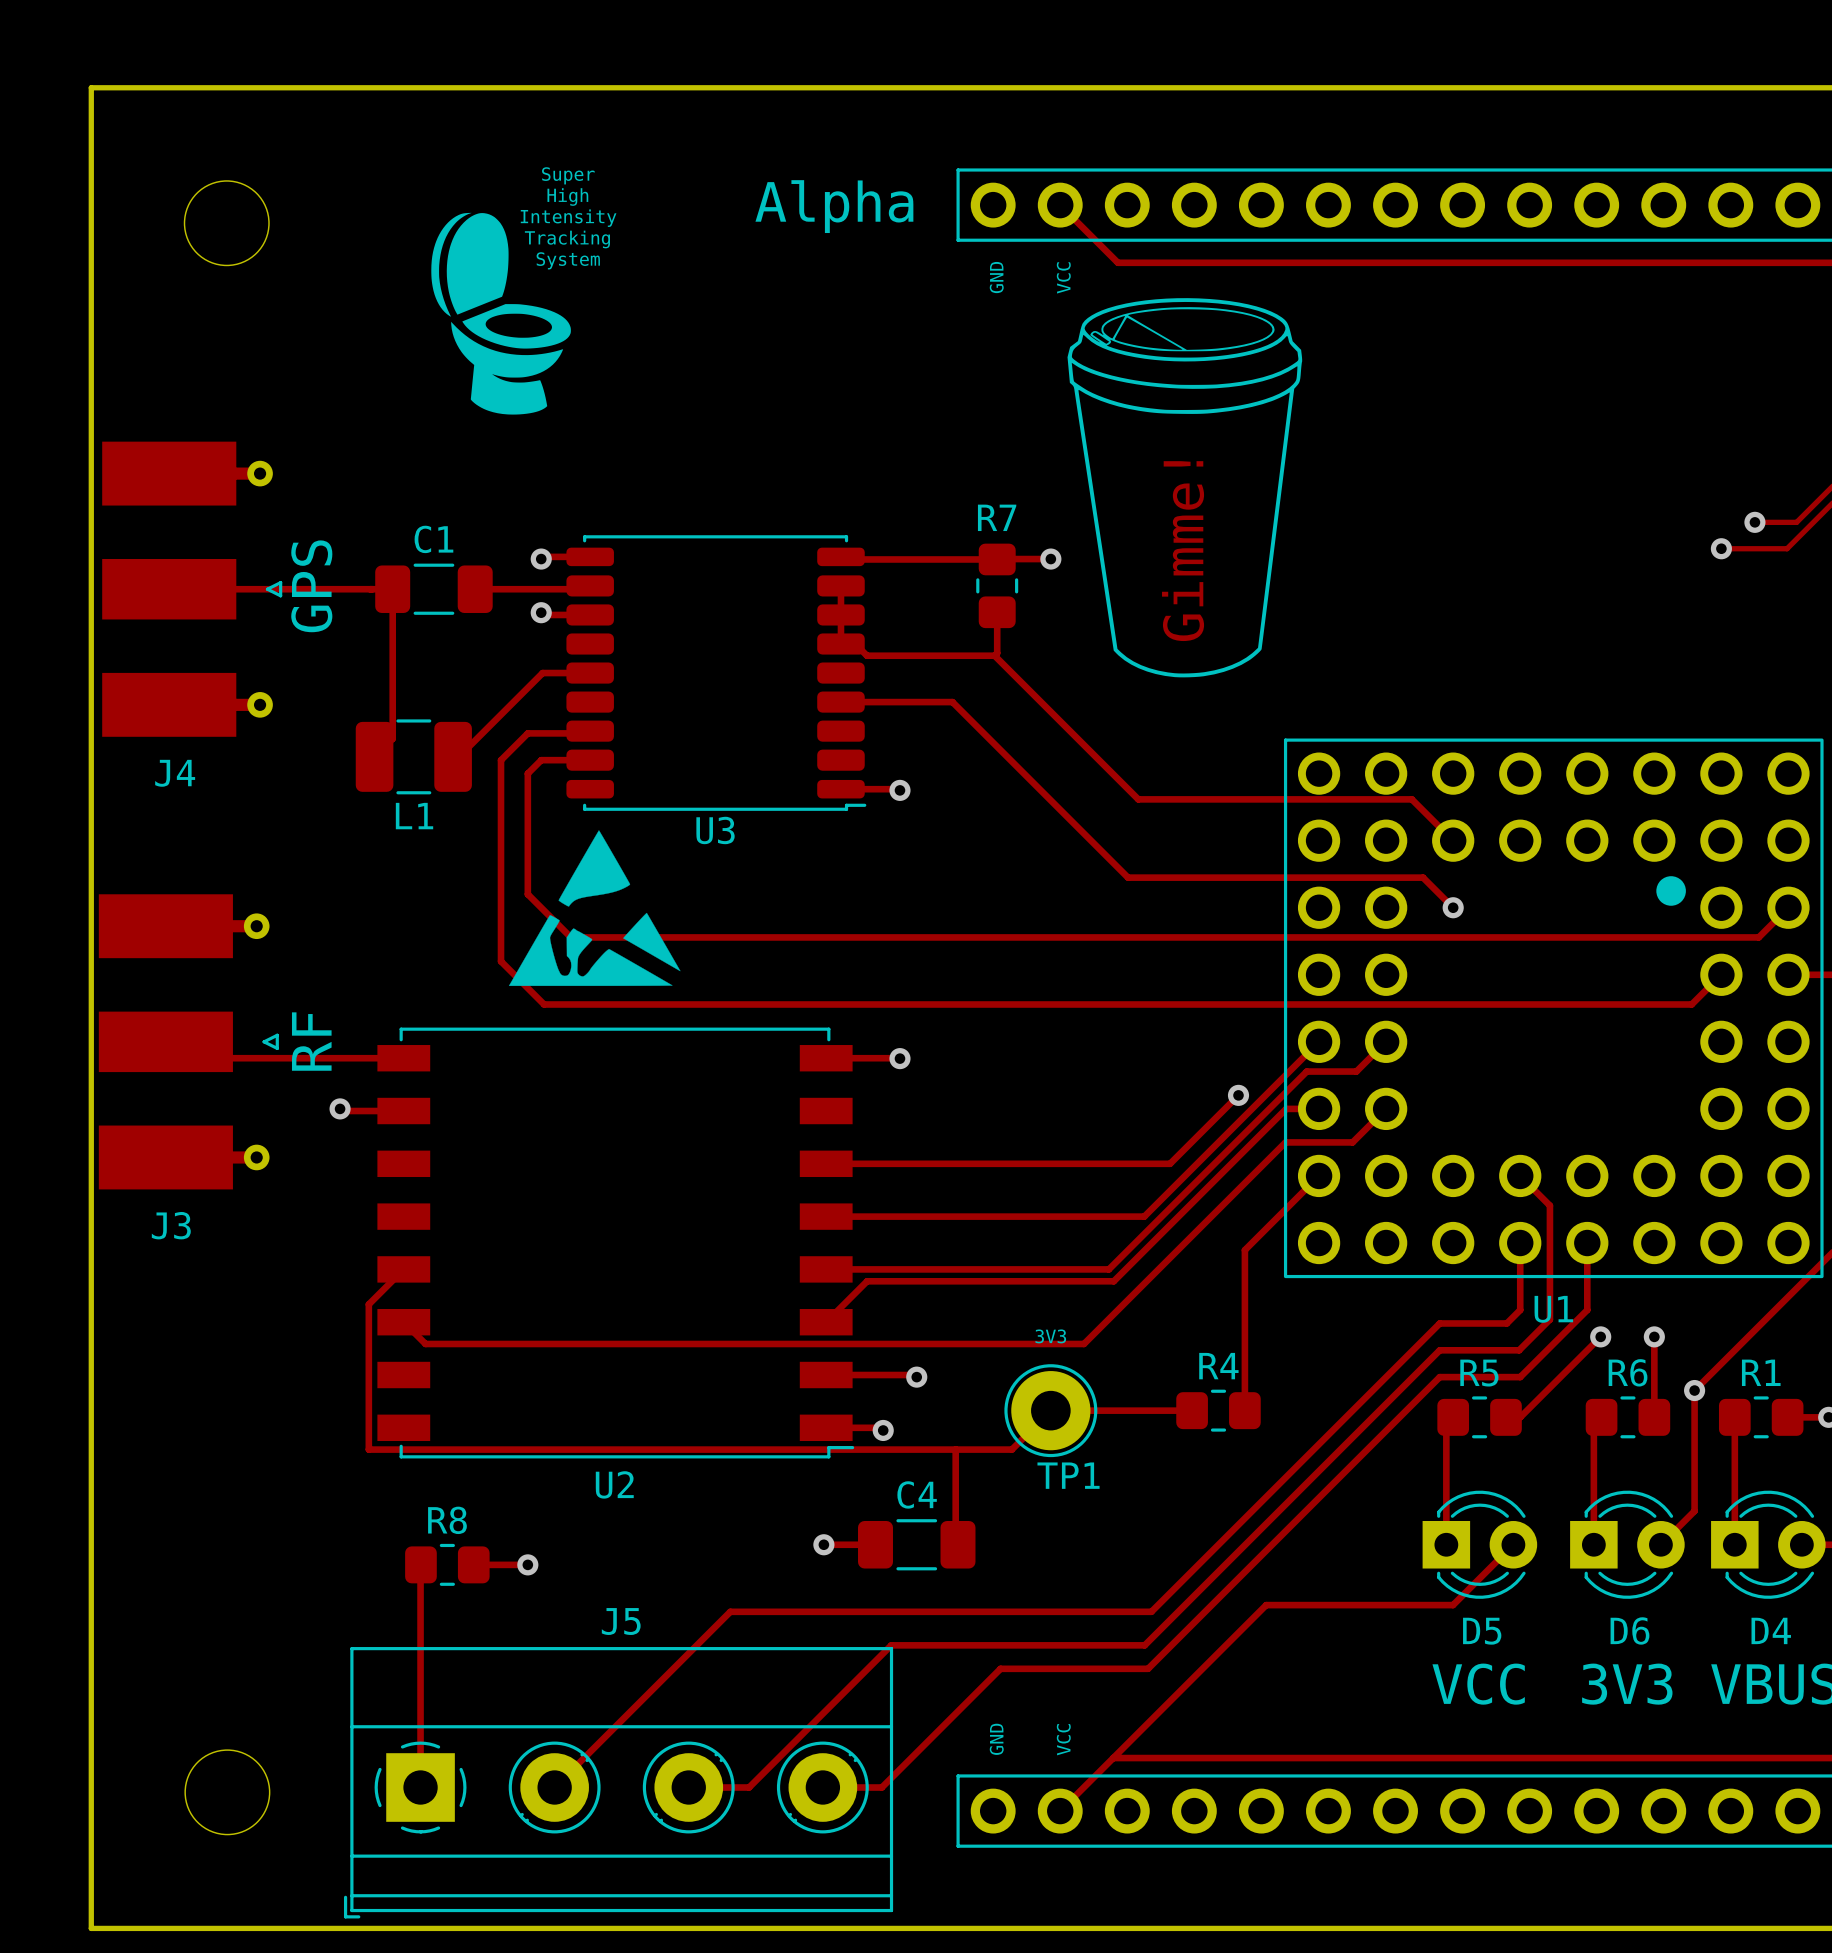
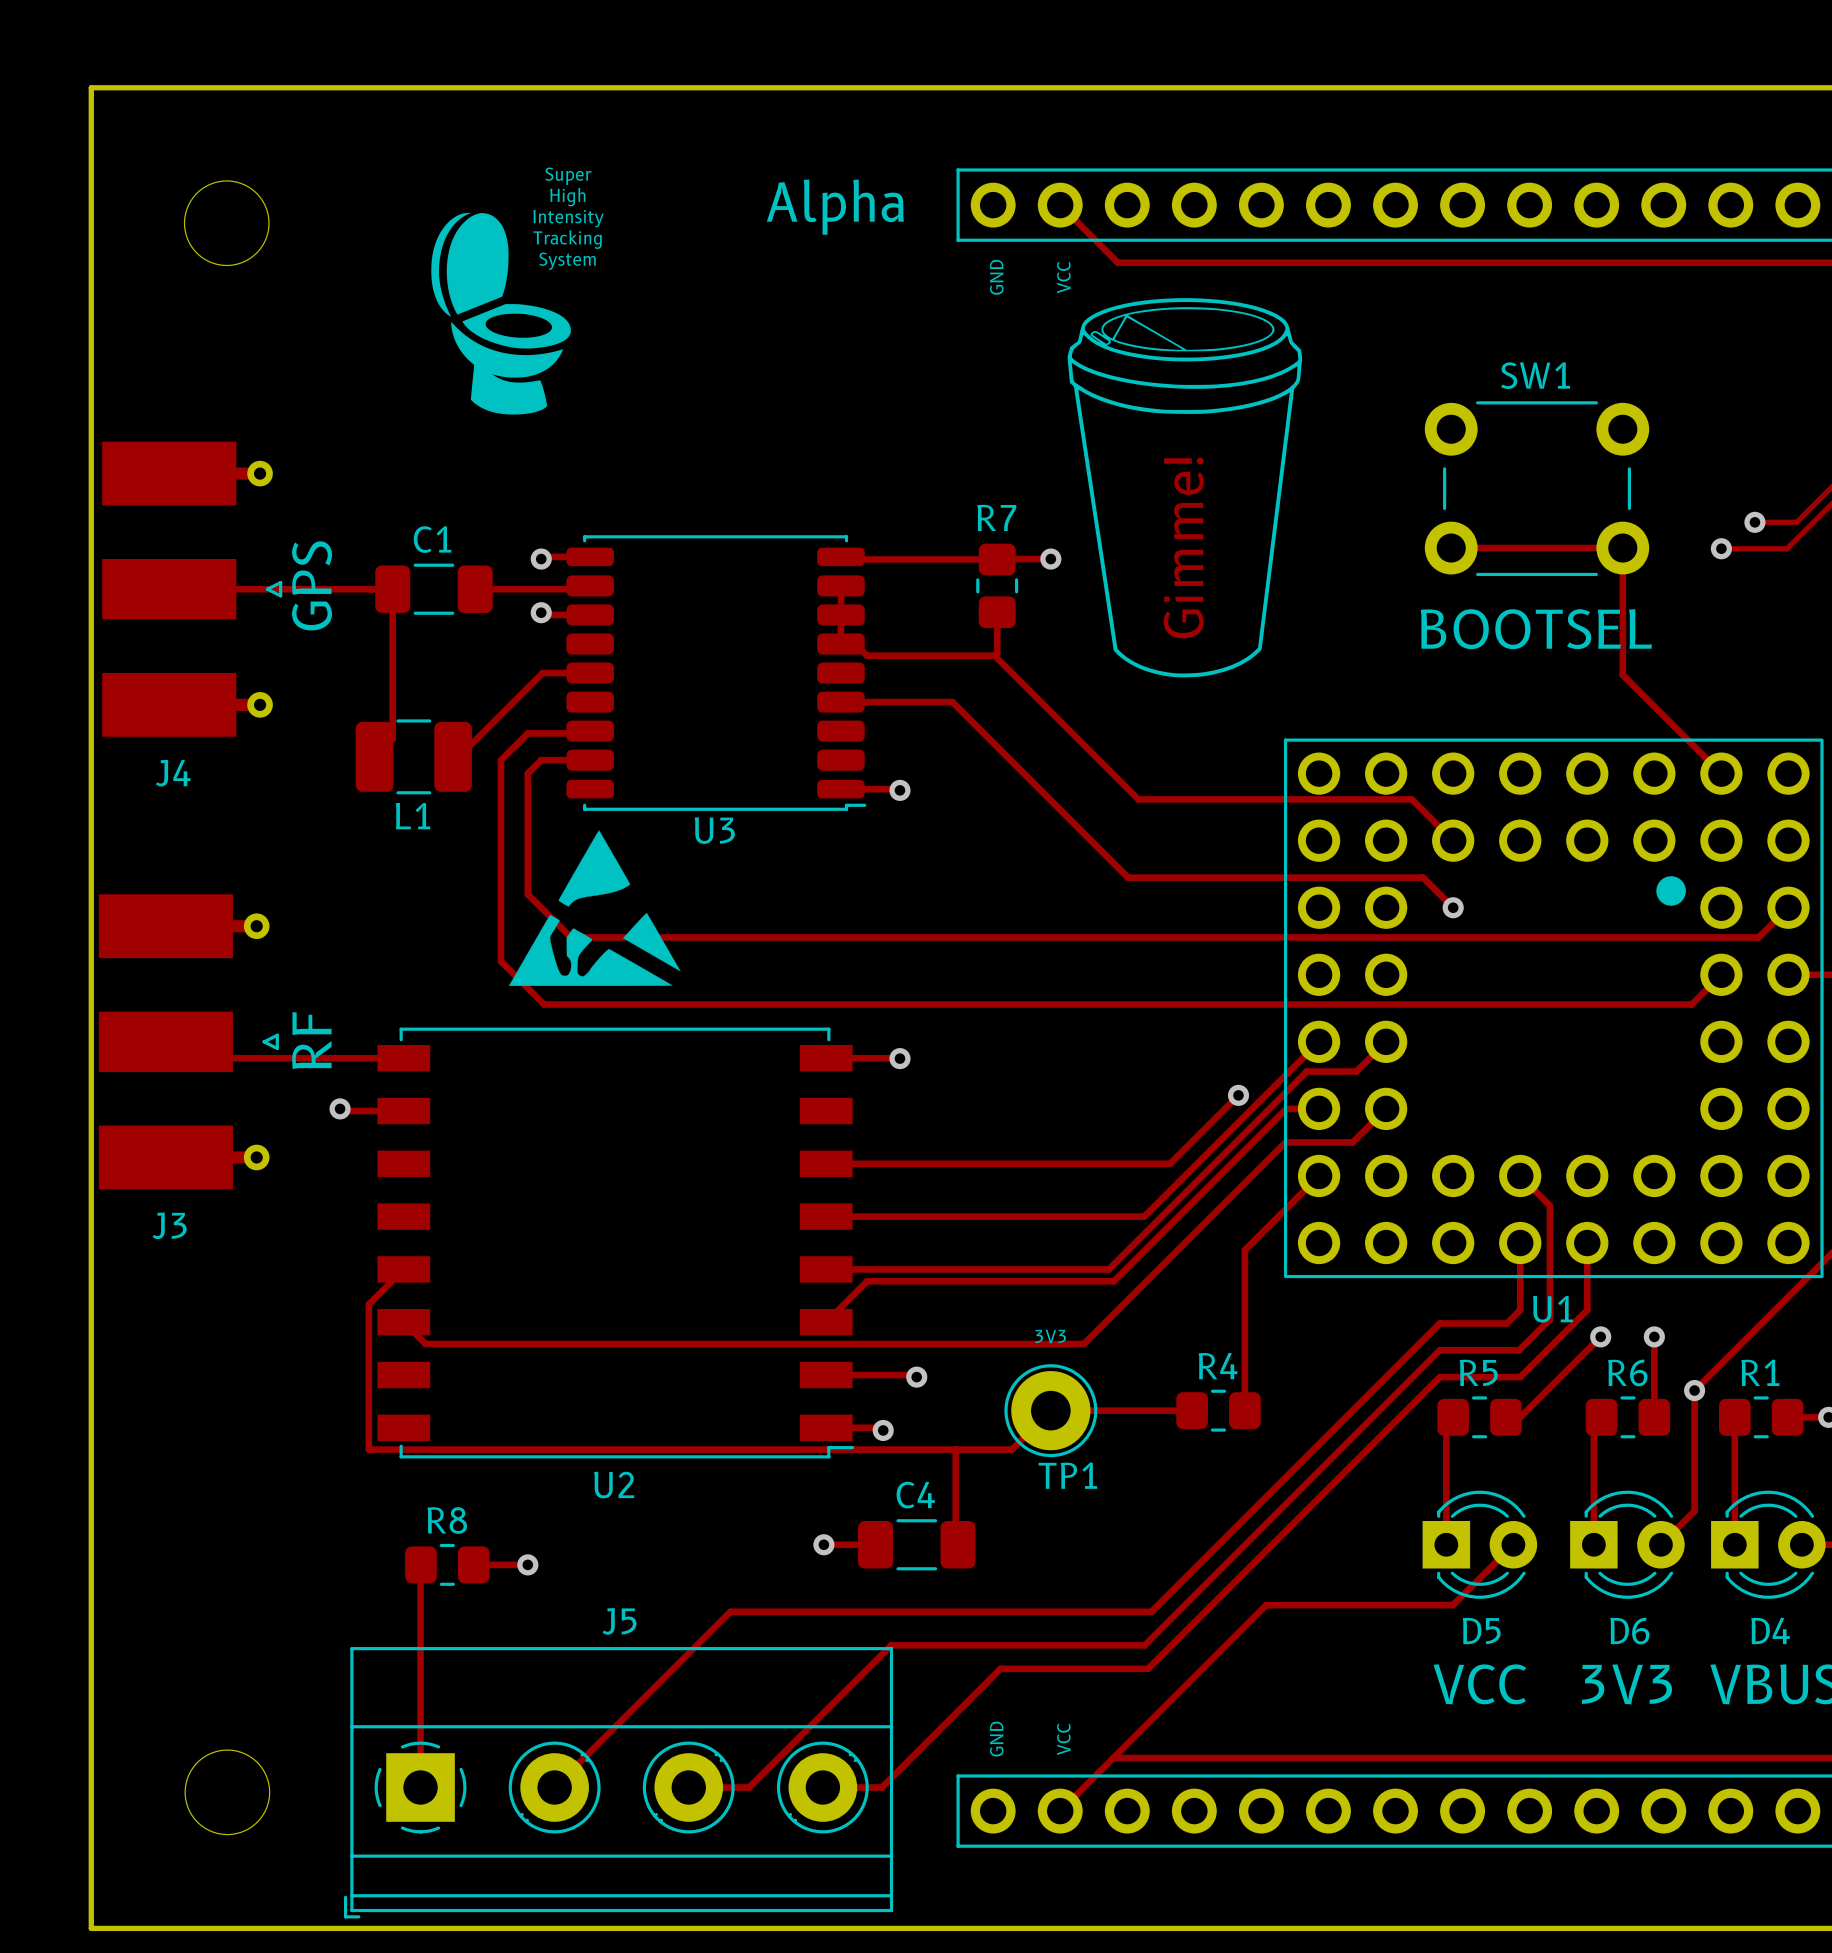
SW1: none -> (1537, 488)
track: none -> (1451, 548) (1622, 548) (1622, 675) (1721, 773) (1721, 758)
text: none -> BOOTSEL (1536, 629)

